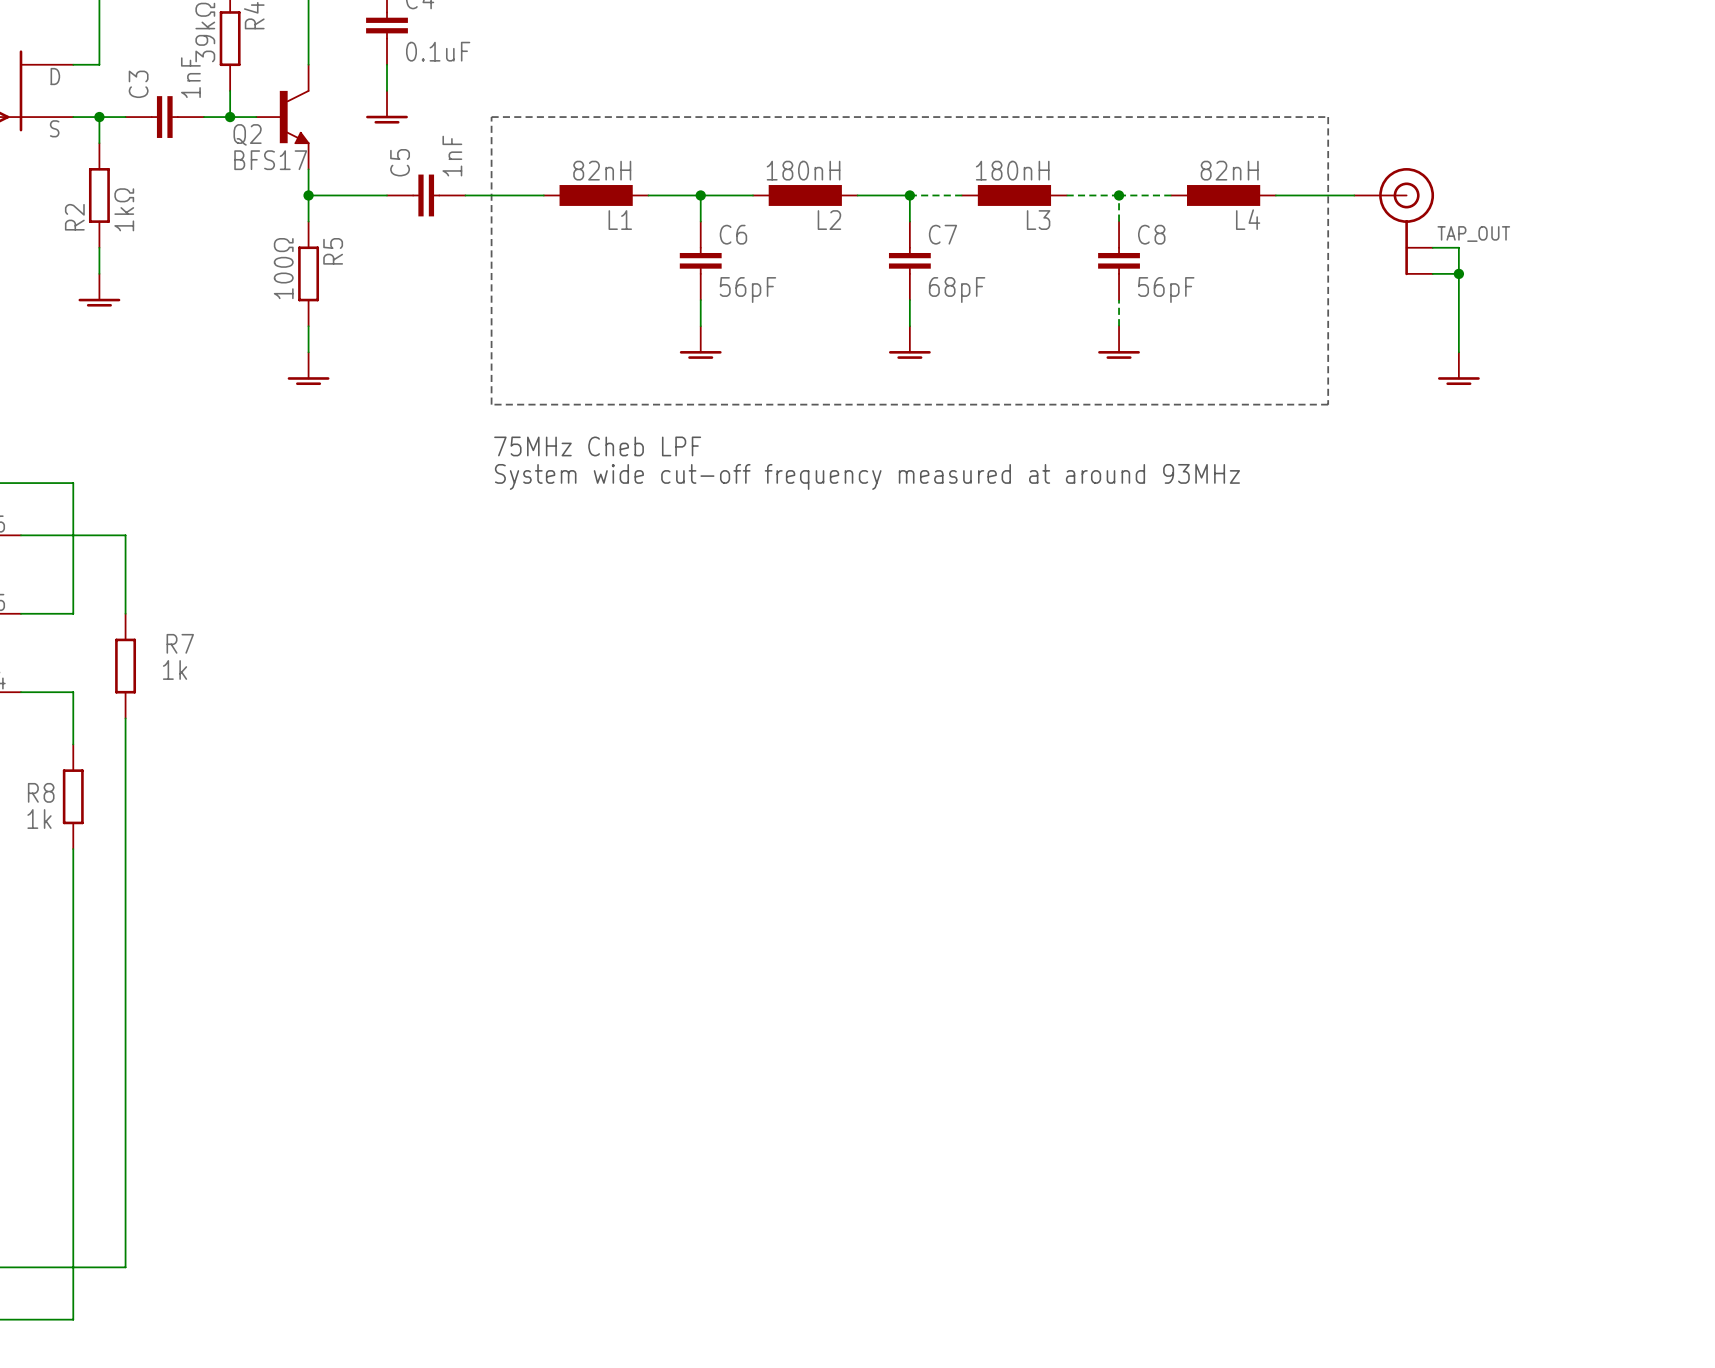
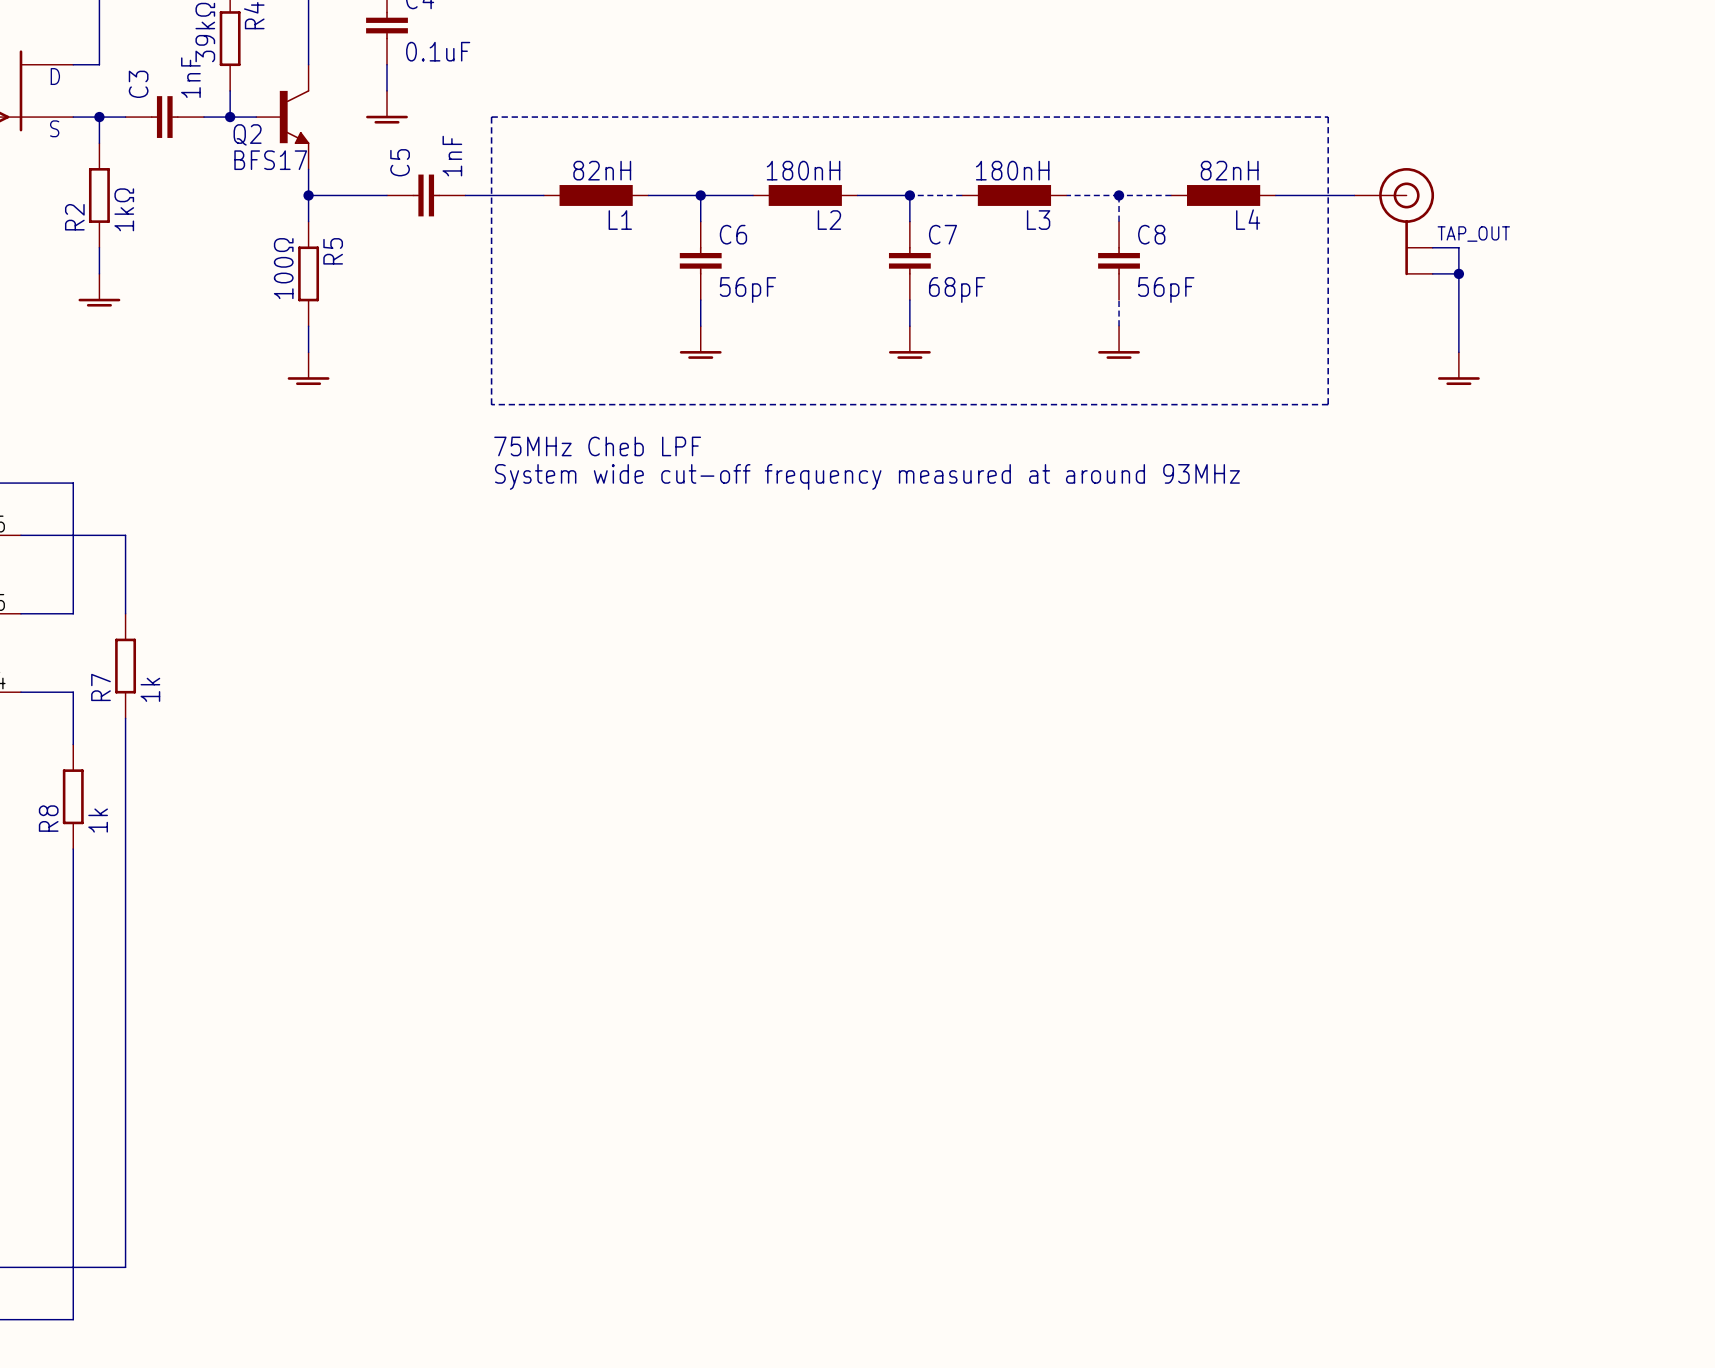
R7 name rotation: 0° (180, 643) -> 90° counterclockwise (100, 687)
R7 name position: R7 (180, 643) -> R7 (100, 687)
R7 value rotation: 0° (175, 669) -> 90° counterclockwise (150, 689)
R8 name rotation: 0° (41, 792) -> 90° counterclockwise (48, 818)
R8 value rotation: 0° (39, 819) -> 90° counterclockwise (98, 820)
R8 value position: 1k (39, 819) -> 1k (98, 820)

